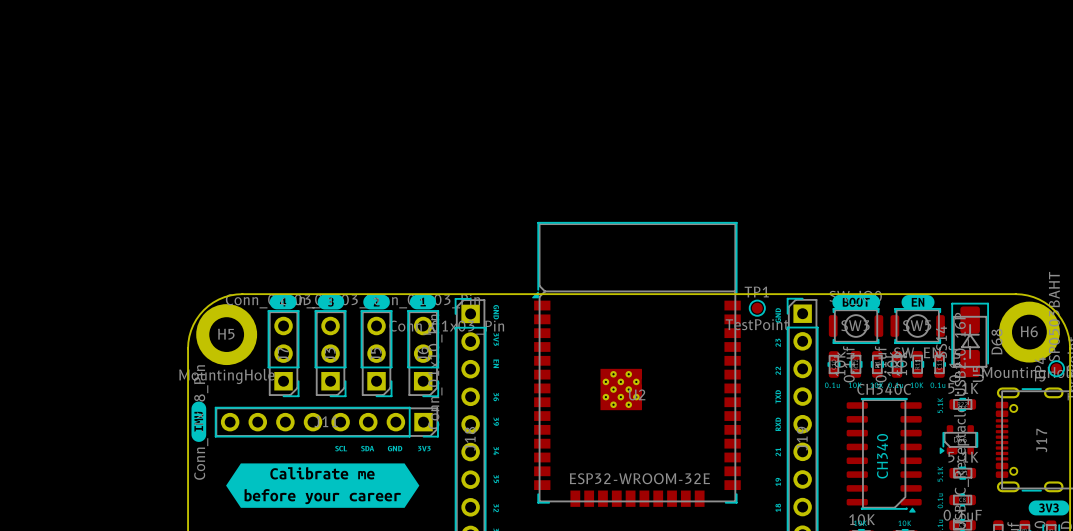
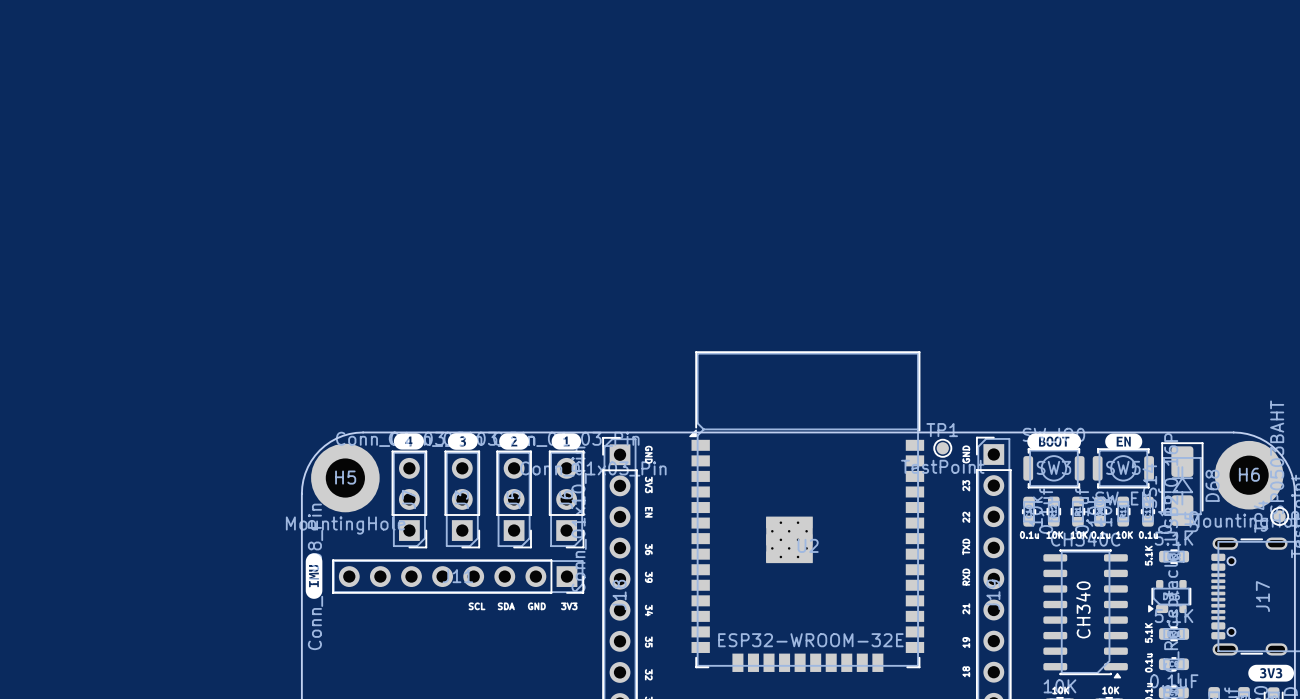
drawing: [226, 463, 420, 508] -> none

